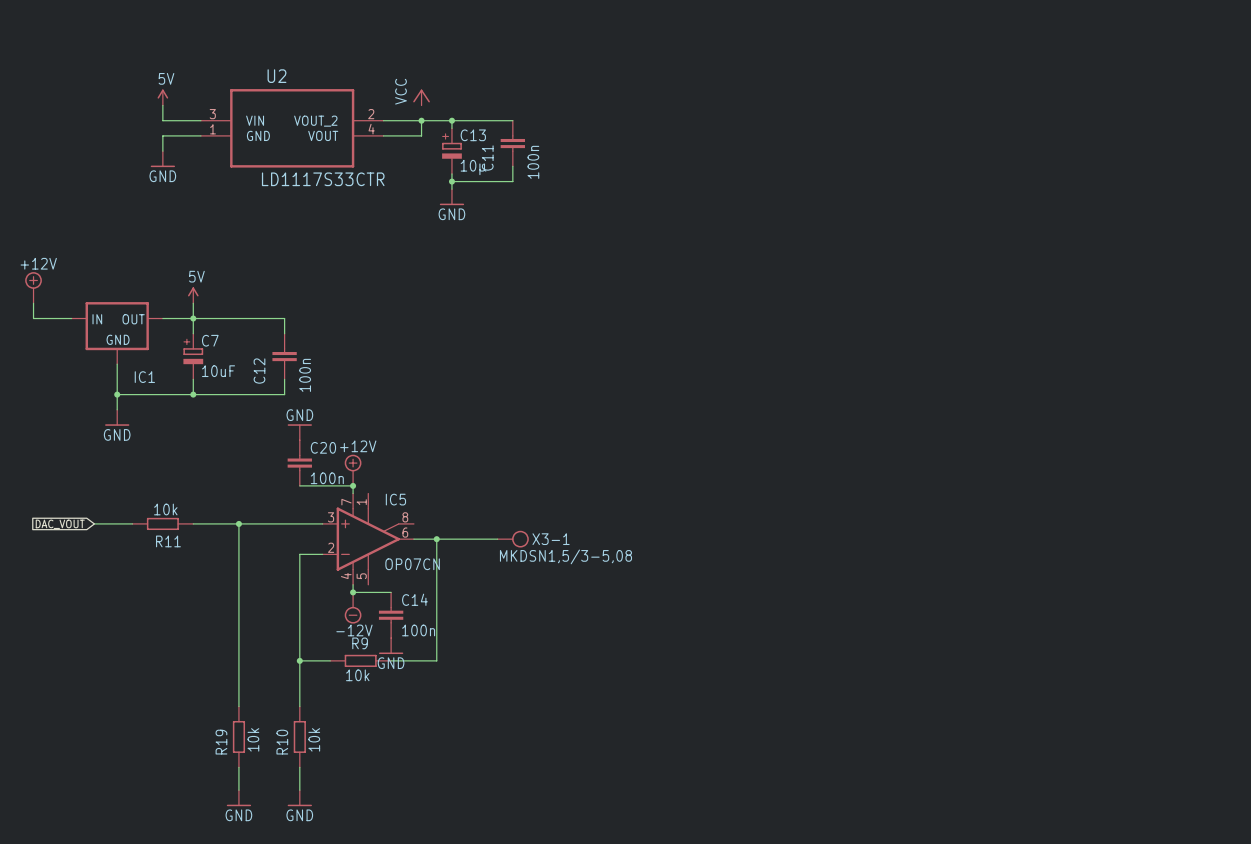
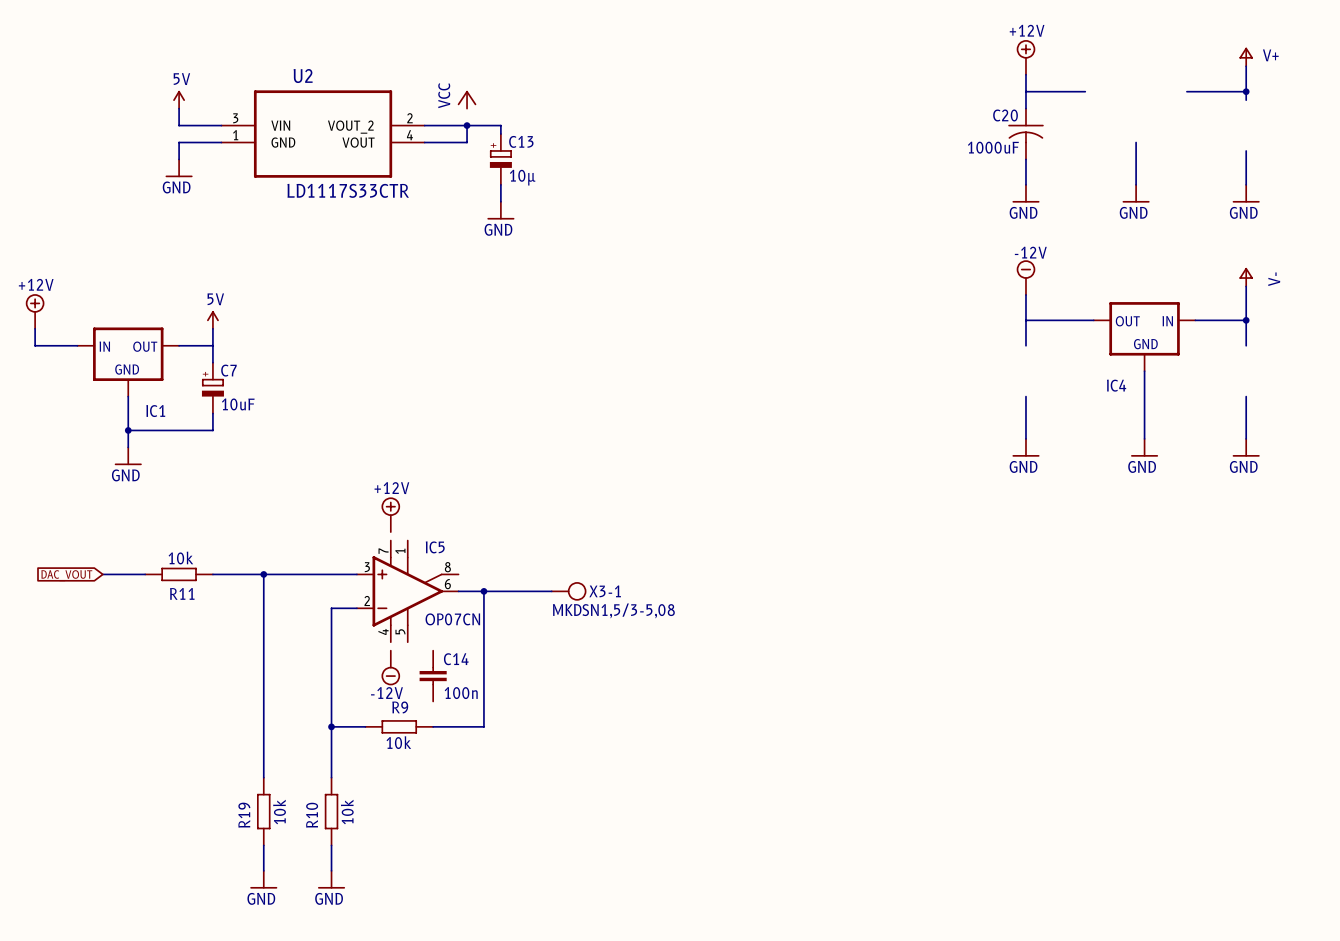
power symbol: none -> +12V (1025, 57)
power symbol: none -> V+ (1246, 56)
wire: none -> (1246, 66) (1246, 100)
wire: none -> (1025, 74) (1025, 108)
wire: none -> (1025, 91) (1085, 91)
wire: none -> (1186, 91) (1246, 91)
junction: none -> (1246, 91)
wire: (451, 120) (512, 120) -> none
junction: (451, 120) -> none
wire: none -> (1136, 142) (1136, 184)
C11: 100n (512, 143) -> none
wire: none -> (1246, 150) (1246, 184)
wire: none -> (1025, 159) (1025, 184)
wire: (512, 166) (512, 181) (451, 181) -> none
junction: (451, 181) -> none
power symbol: none -> GND (1025, 193)
power symbol: none -> GND (1136, 193)
power symbol: none -> GND (1246, 193)
power symbol: none -> V- (1246, 277)
power symbol: none -> -12V (1025, 277)
wire: none -> (1246, 286) (1246, 345)
wire: none -> (1025, 294) (1025, 345)
wire: none -> (1025, 320) (1093, 320)
wire: none -> (1195, 320) (1246, 320)
junction: none -> (1246, 320)
IC4: none -> (1144, 336)
wire: (193, 318) (284, 318) (284, 333) -> none
junction: (193, 318) -> none
wire: none -> (1144, 371) (1144, 438)
C12: 100n (284, 356) -> none
wire: none -> (1025, 396) (1025, 438)
wire: none -> (1246, 396) (1246, 438)
wire: (284, 379) (284, 394) (193, 394) -> none
junction: (193, 394) -> none
power symbol: none -> GND (1025, 447)
power symbol: none -> GND (1144, 447)
power symbol: none -> GND (1246, 447)
power symbol: GND (299, 432) -> none
C20 symbol: [287, 440, 312, 486] -> [1008, 108, 1044, 160]
C20 name position: C20 (323, 447) -> C20 (1005, 115)
C20 value: 100n (327, 478) -> 1000uF (993, 147)
wire: (299, 485) (353, 485) (353, 493) -> none
junction: (353, 485) -> none
wire: (353, 584) (353, 592) (391, 592) -> none
junction: (353, 592) -> none
power symbol: GND (391, 646) -> none

